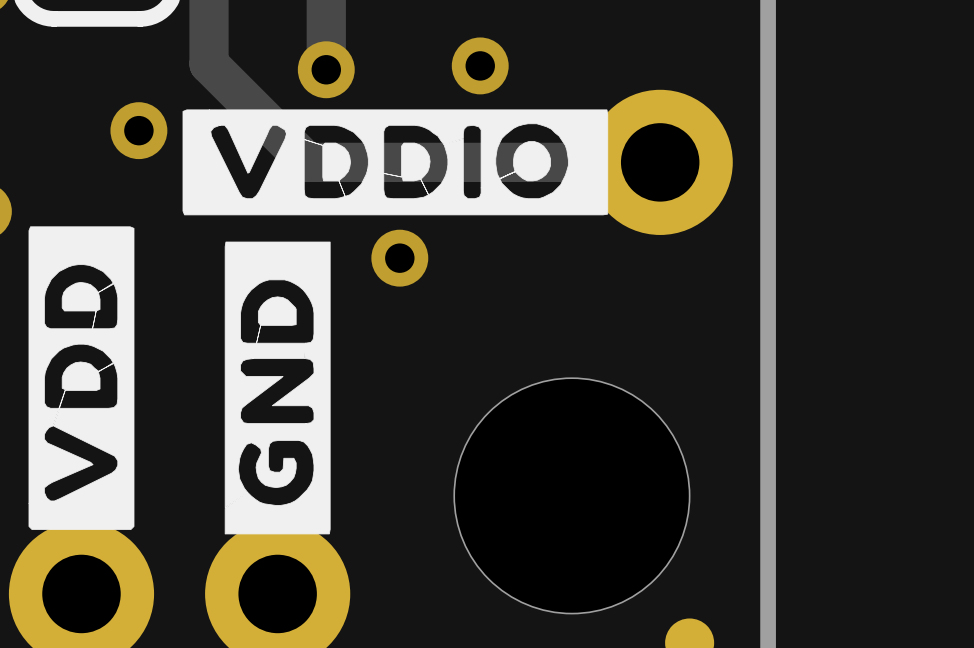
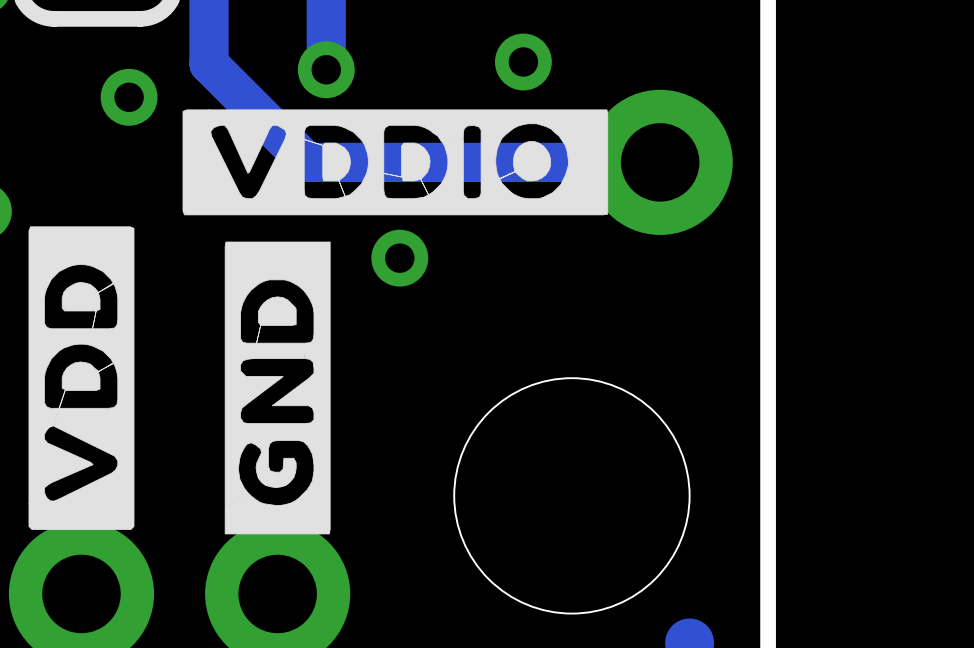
via position: (480, 65) -> (523, 61)
via position: (138, 130) -> (129, 97)

